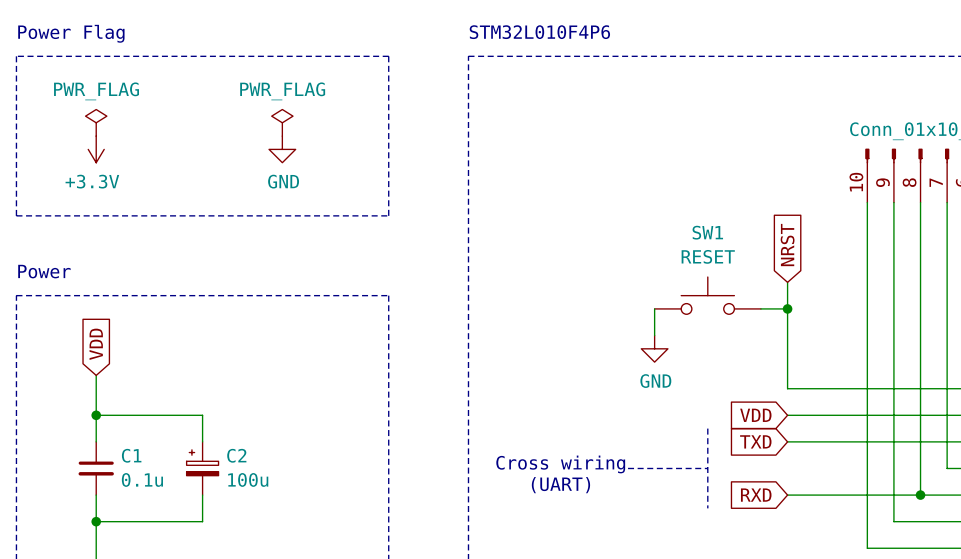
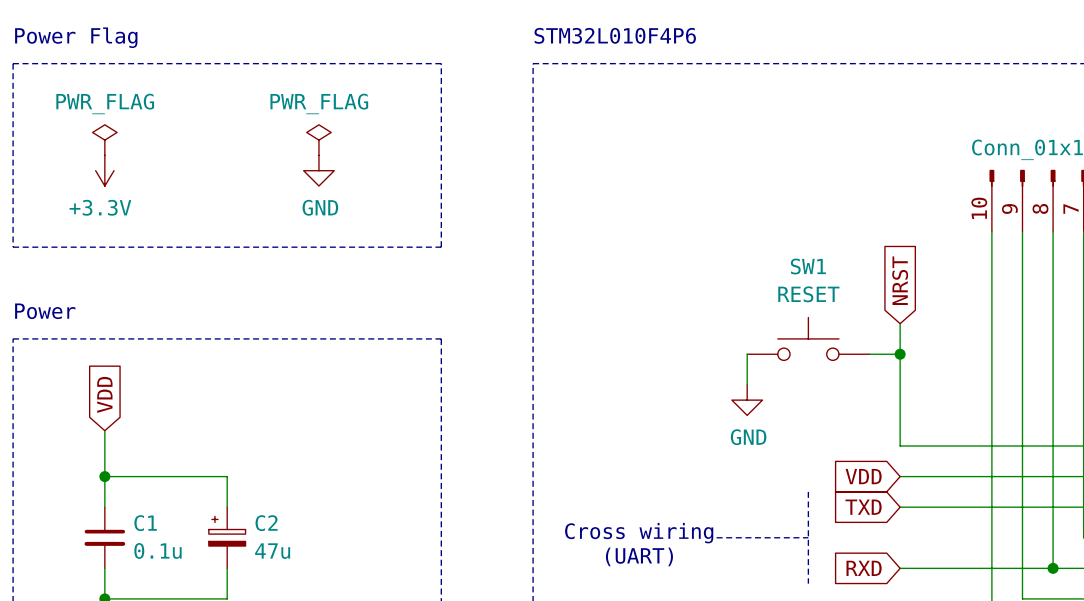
C2 value: 100u (248, 479) -> 47u (272, 551)

